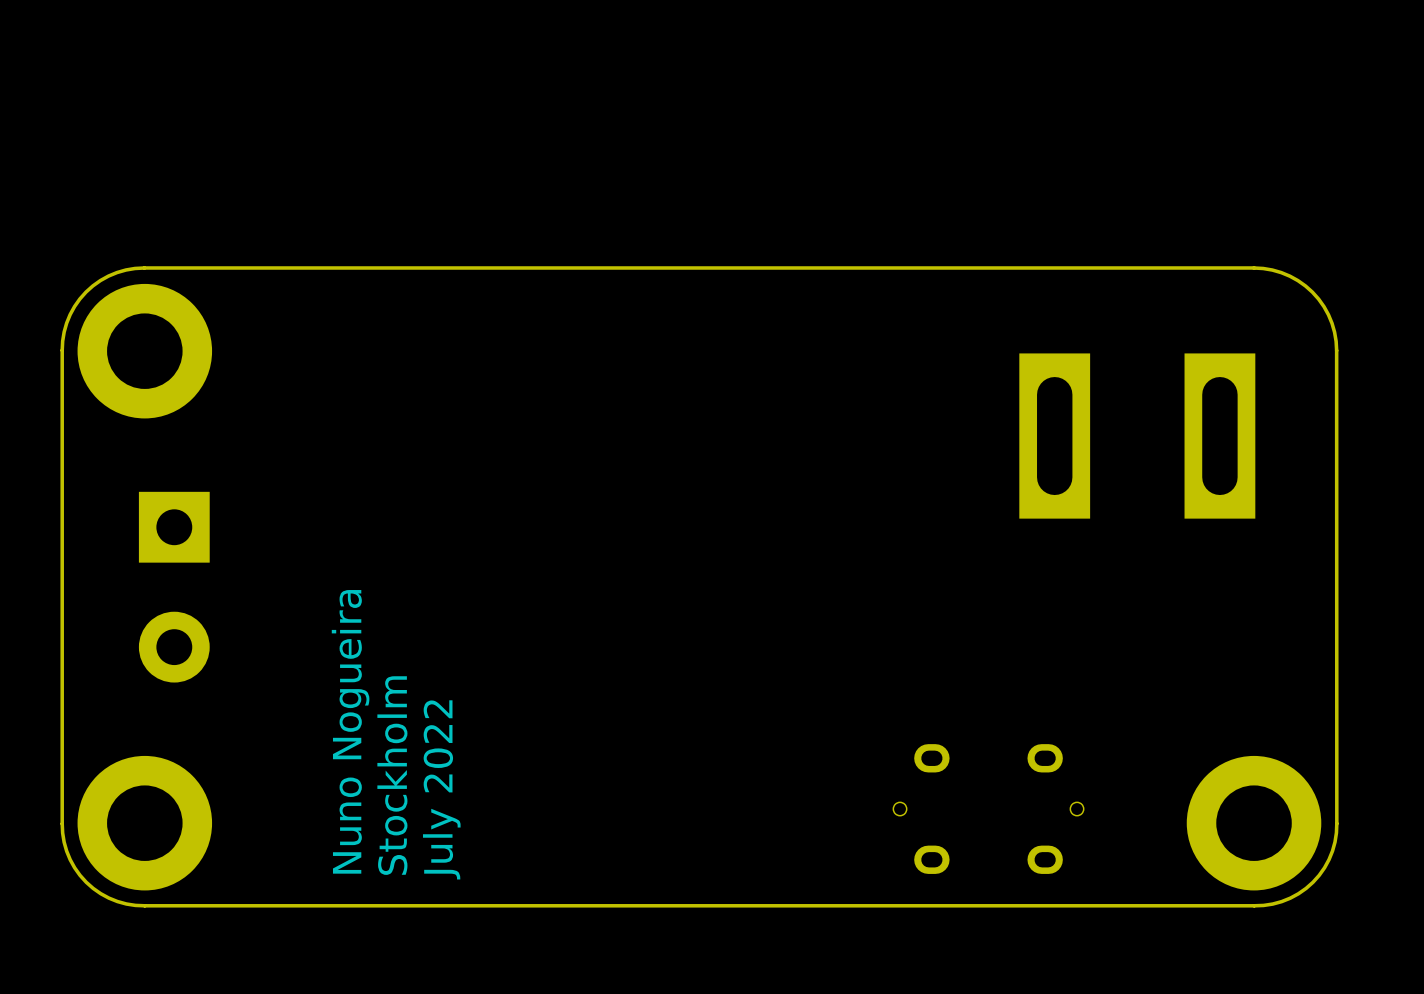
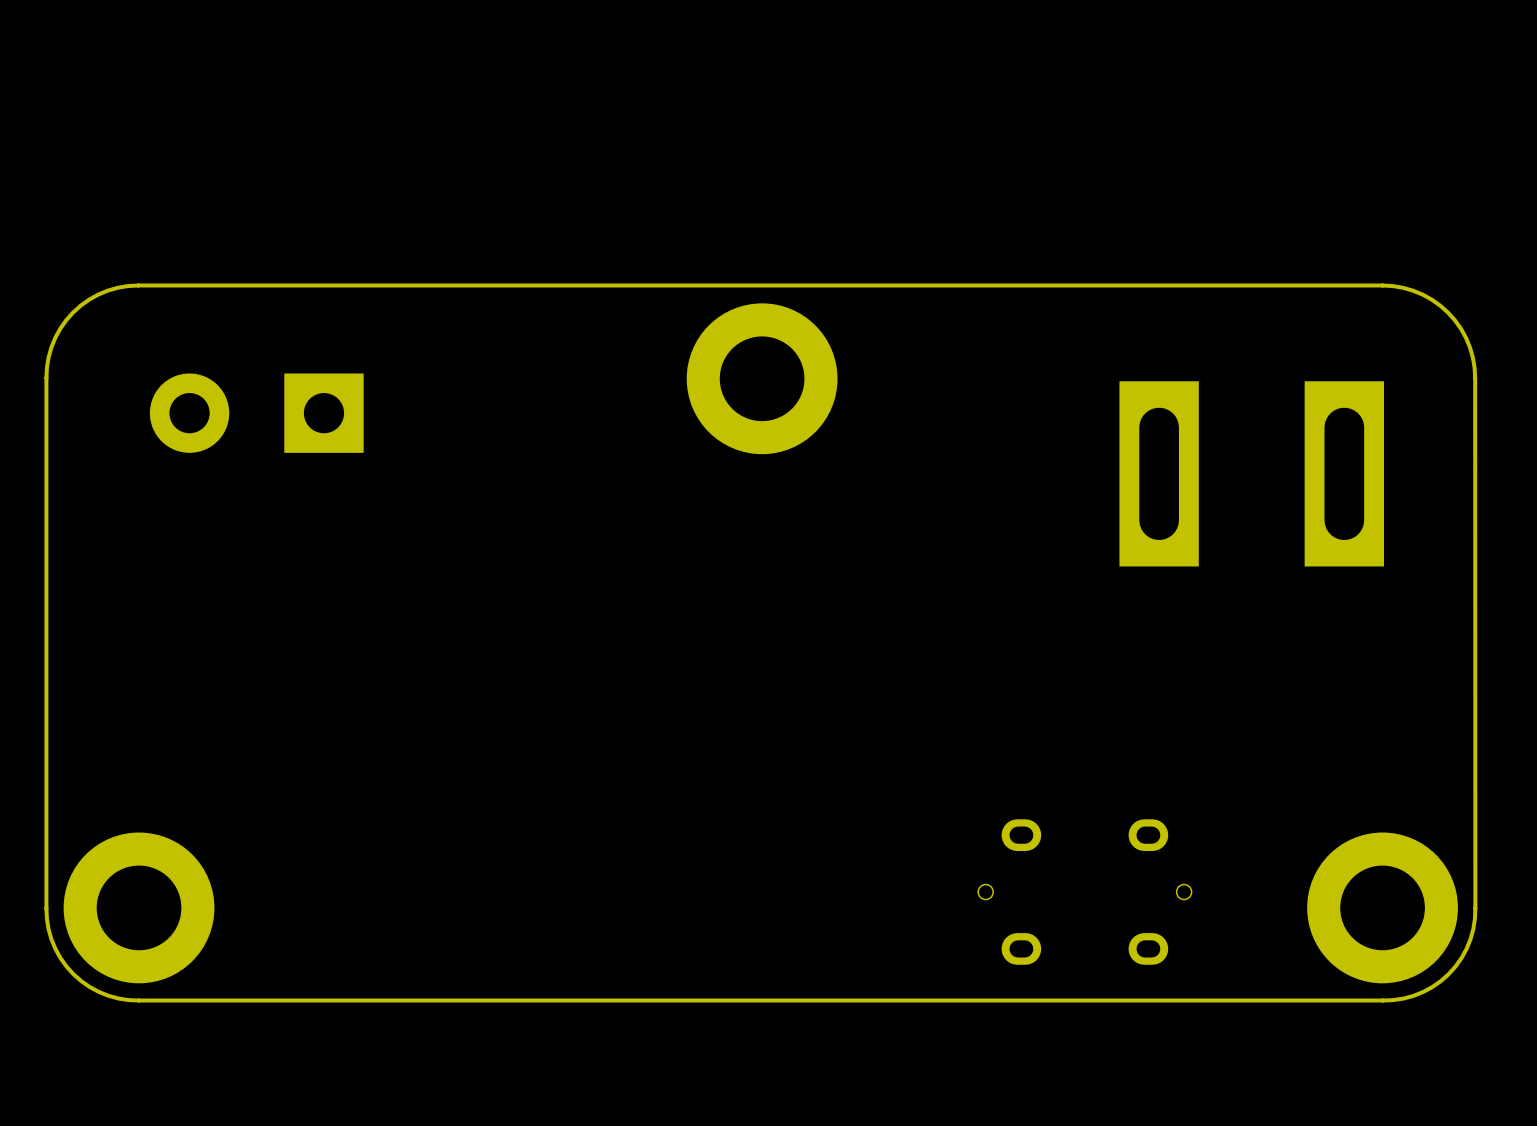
part position: (144, 351) -> (762, 378)
part rotation: 0° (174, 587) -> 90° clockwise (256, 413)
part position: (174, 587) -> (256, 413)
text: Nuno Nogueira (350, 731) -> none
text: Stockholm (392, 775) -> none
text: July 2022 (441, 789) -> none

